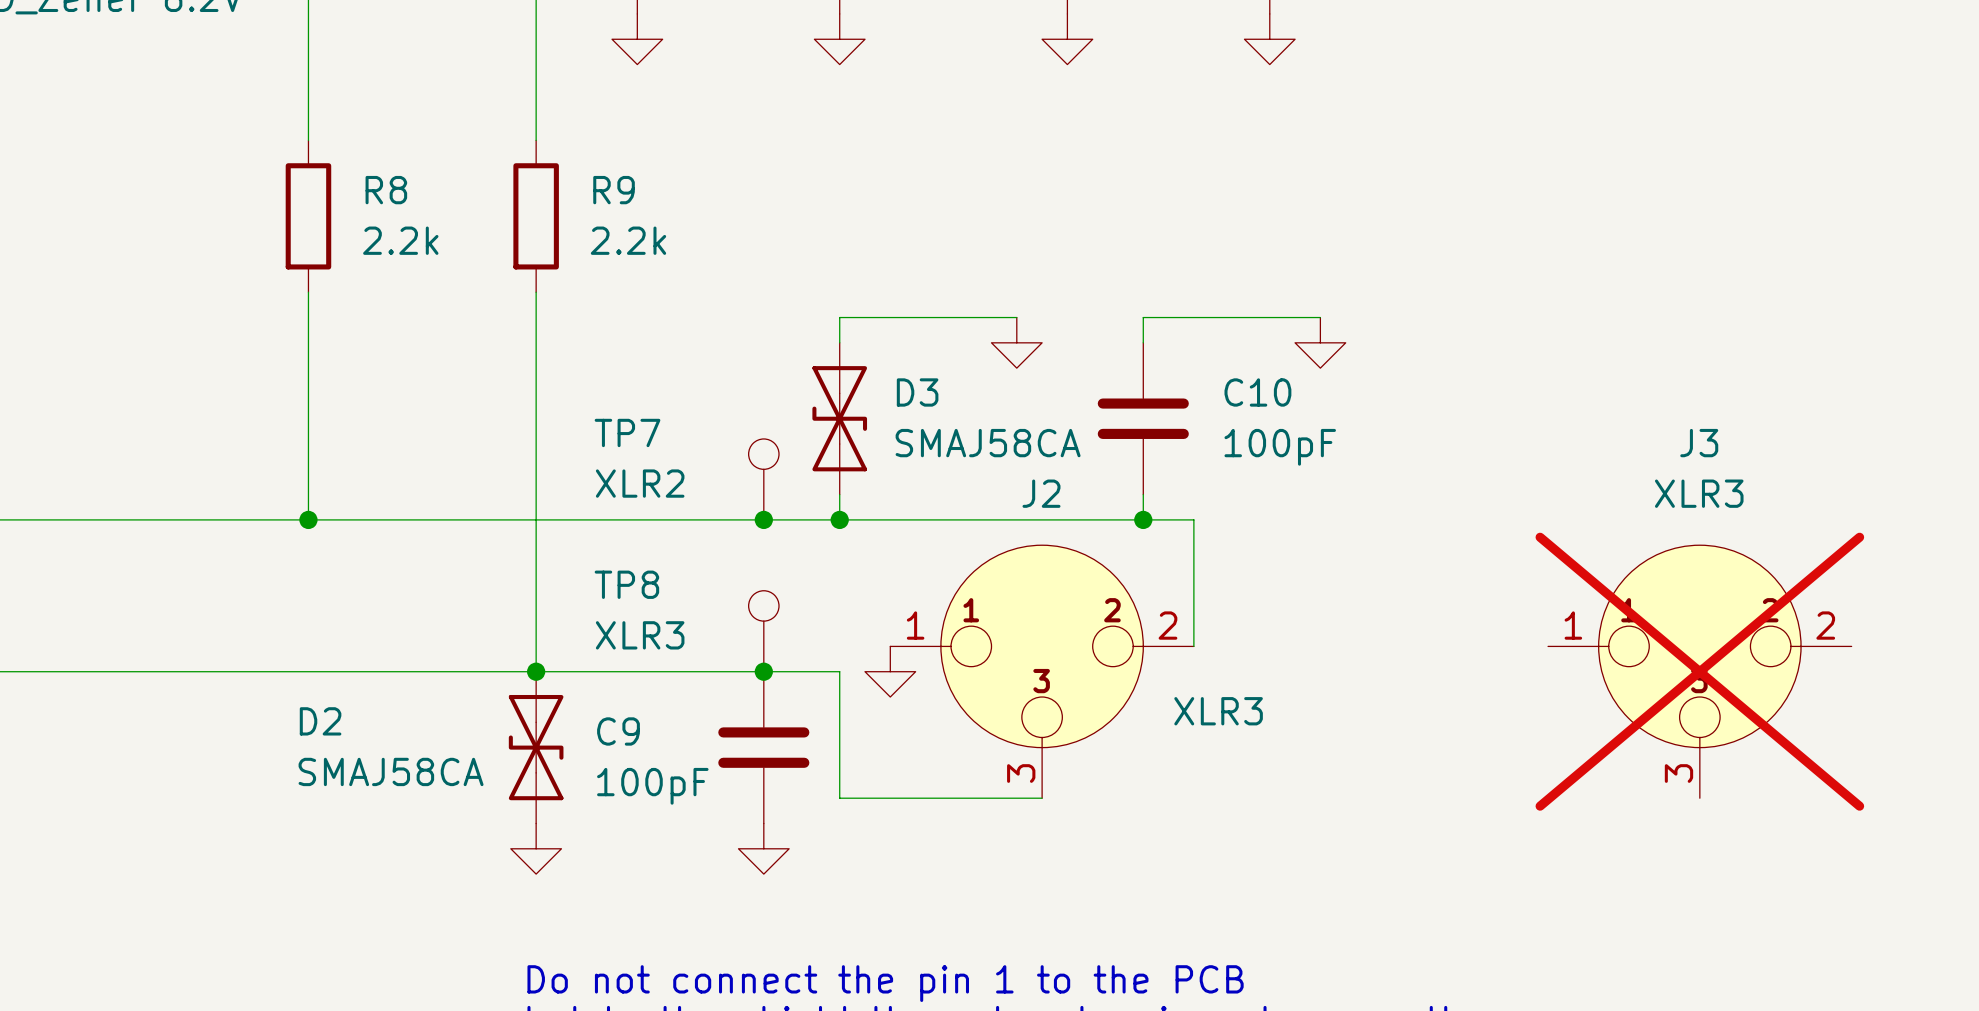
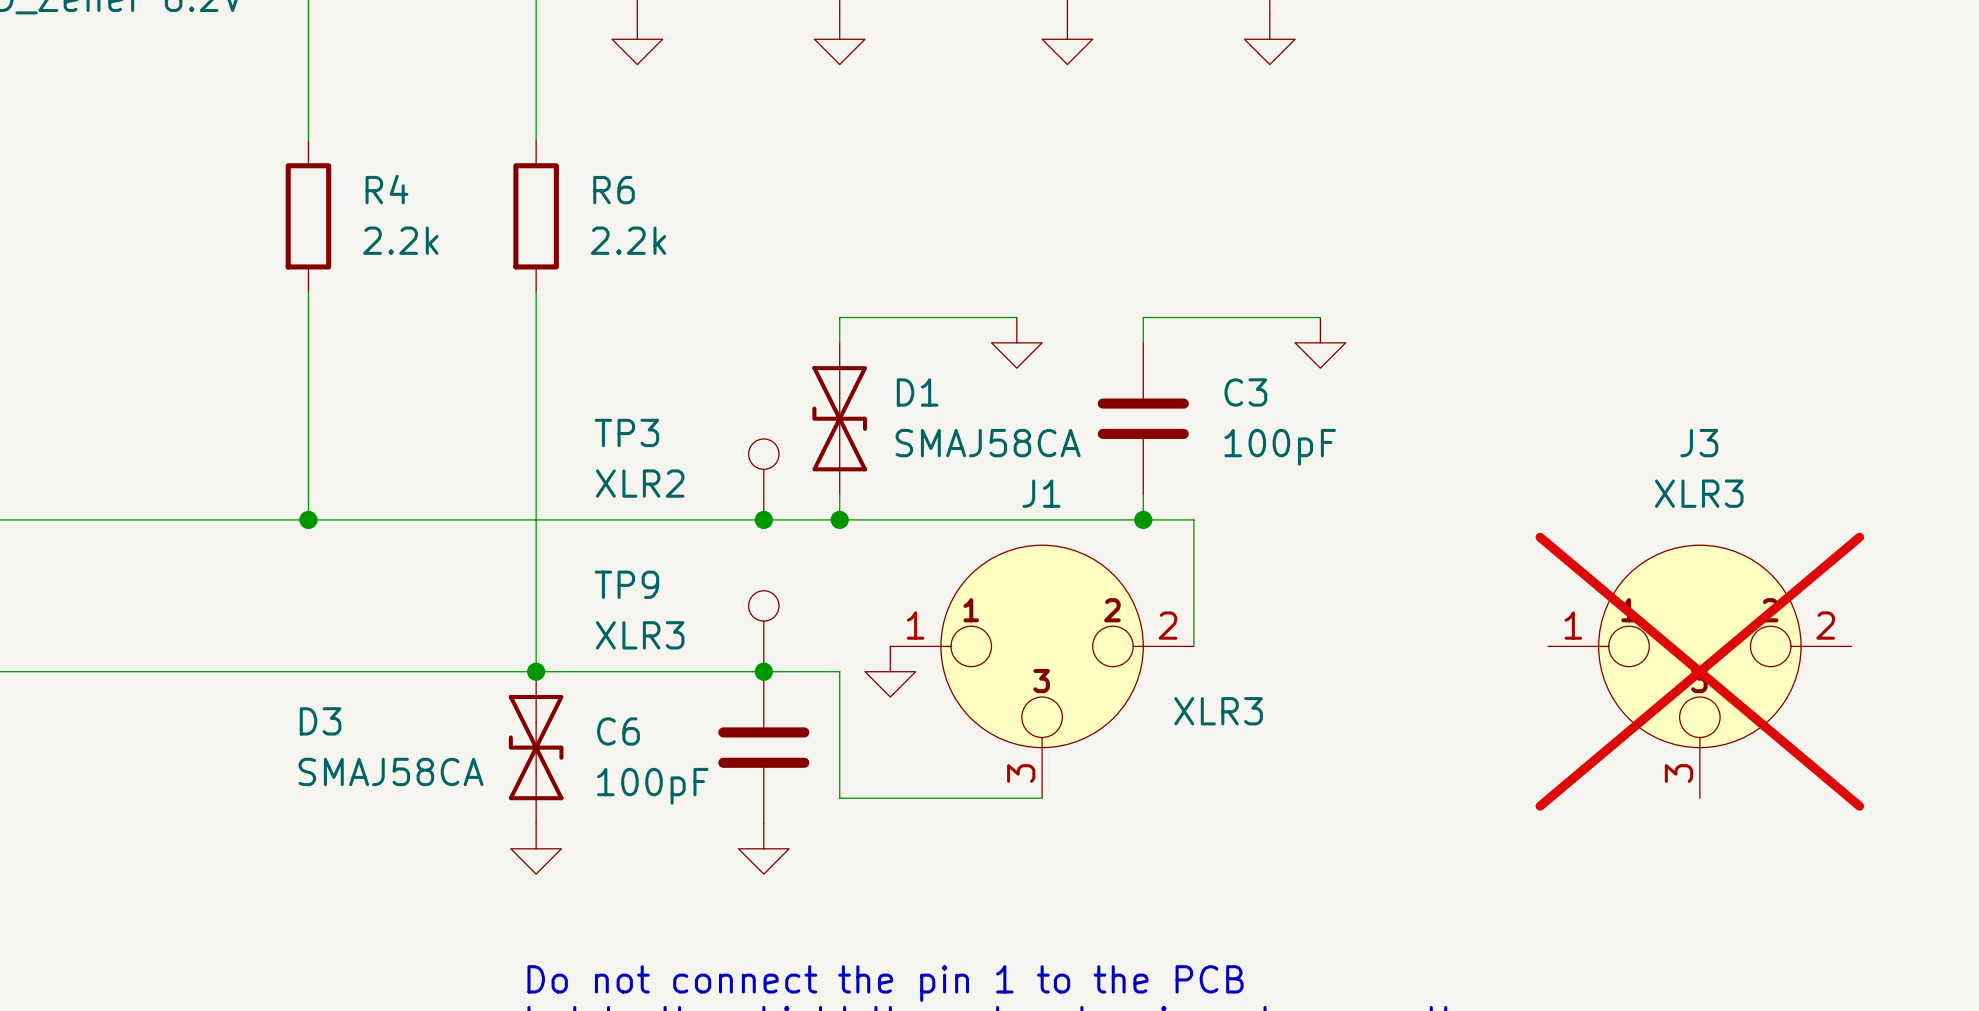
R8 name: R8 (386, 190) -> R4 (386, 189)
R9 name: R9 (614, 190) -> R6 (614, 190)
D3 name: D3 (917, 392) -> D1 (917, 392)
C10 name: C10 (1257, 392) -> C3 (1245, 392)
TP7 name: TP7 (627, 432) -> TP3 (626, 432)
J2 name: J2 (1041, 493) -> J1 (1041, 493)
TP8 name: TP8 (626, 584) -> TP9 (626, 584)
D2 name: D2 (320, 721) -> D3 (320, 721)
C9 name: C9 (618, 731) -> C6 (618, 731)

